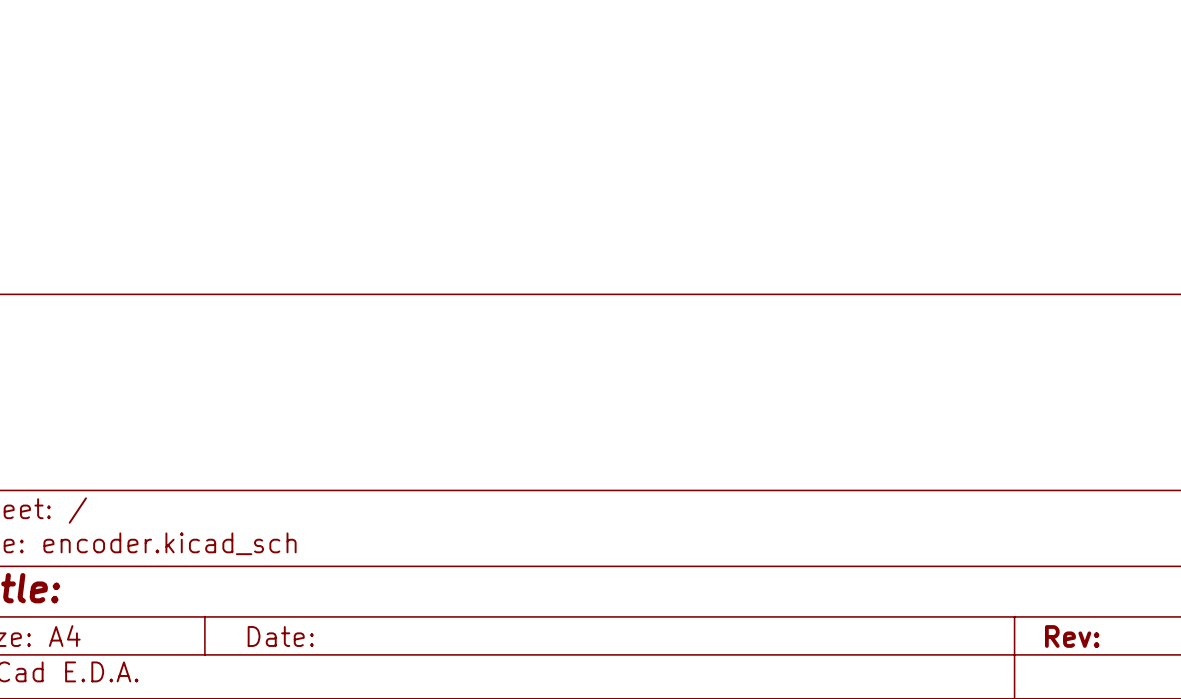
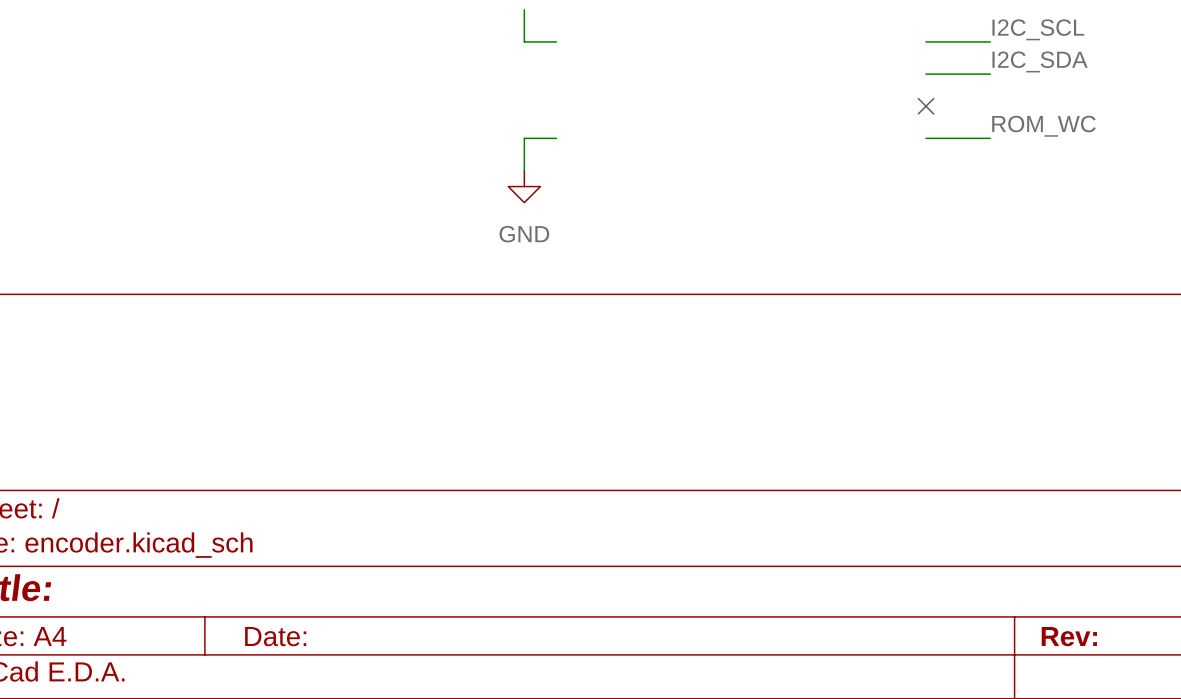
wire: none -> (524, 9) (524, 41) (556, 41)
label: none -> I2C_SCL (1038, 29)
wire: none -> (926, 41) (990, 41)
label: none -> I2C_SDA (1040, 61)
wire: none -> (926, 74) (990, 74)
no-connect mark: none -> (926, 106)
label: none -> ROM_WC (1043, 126)
wire: none -> (556, 138) (524, 138) (524, 170)
wire: none -> (926, 138) (990, 138)
power symbol: none -> GND (524, 186)

